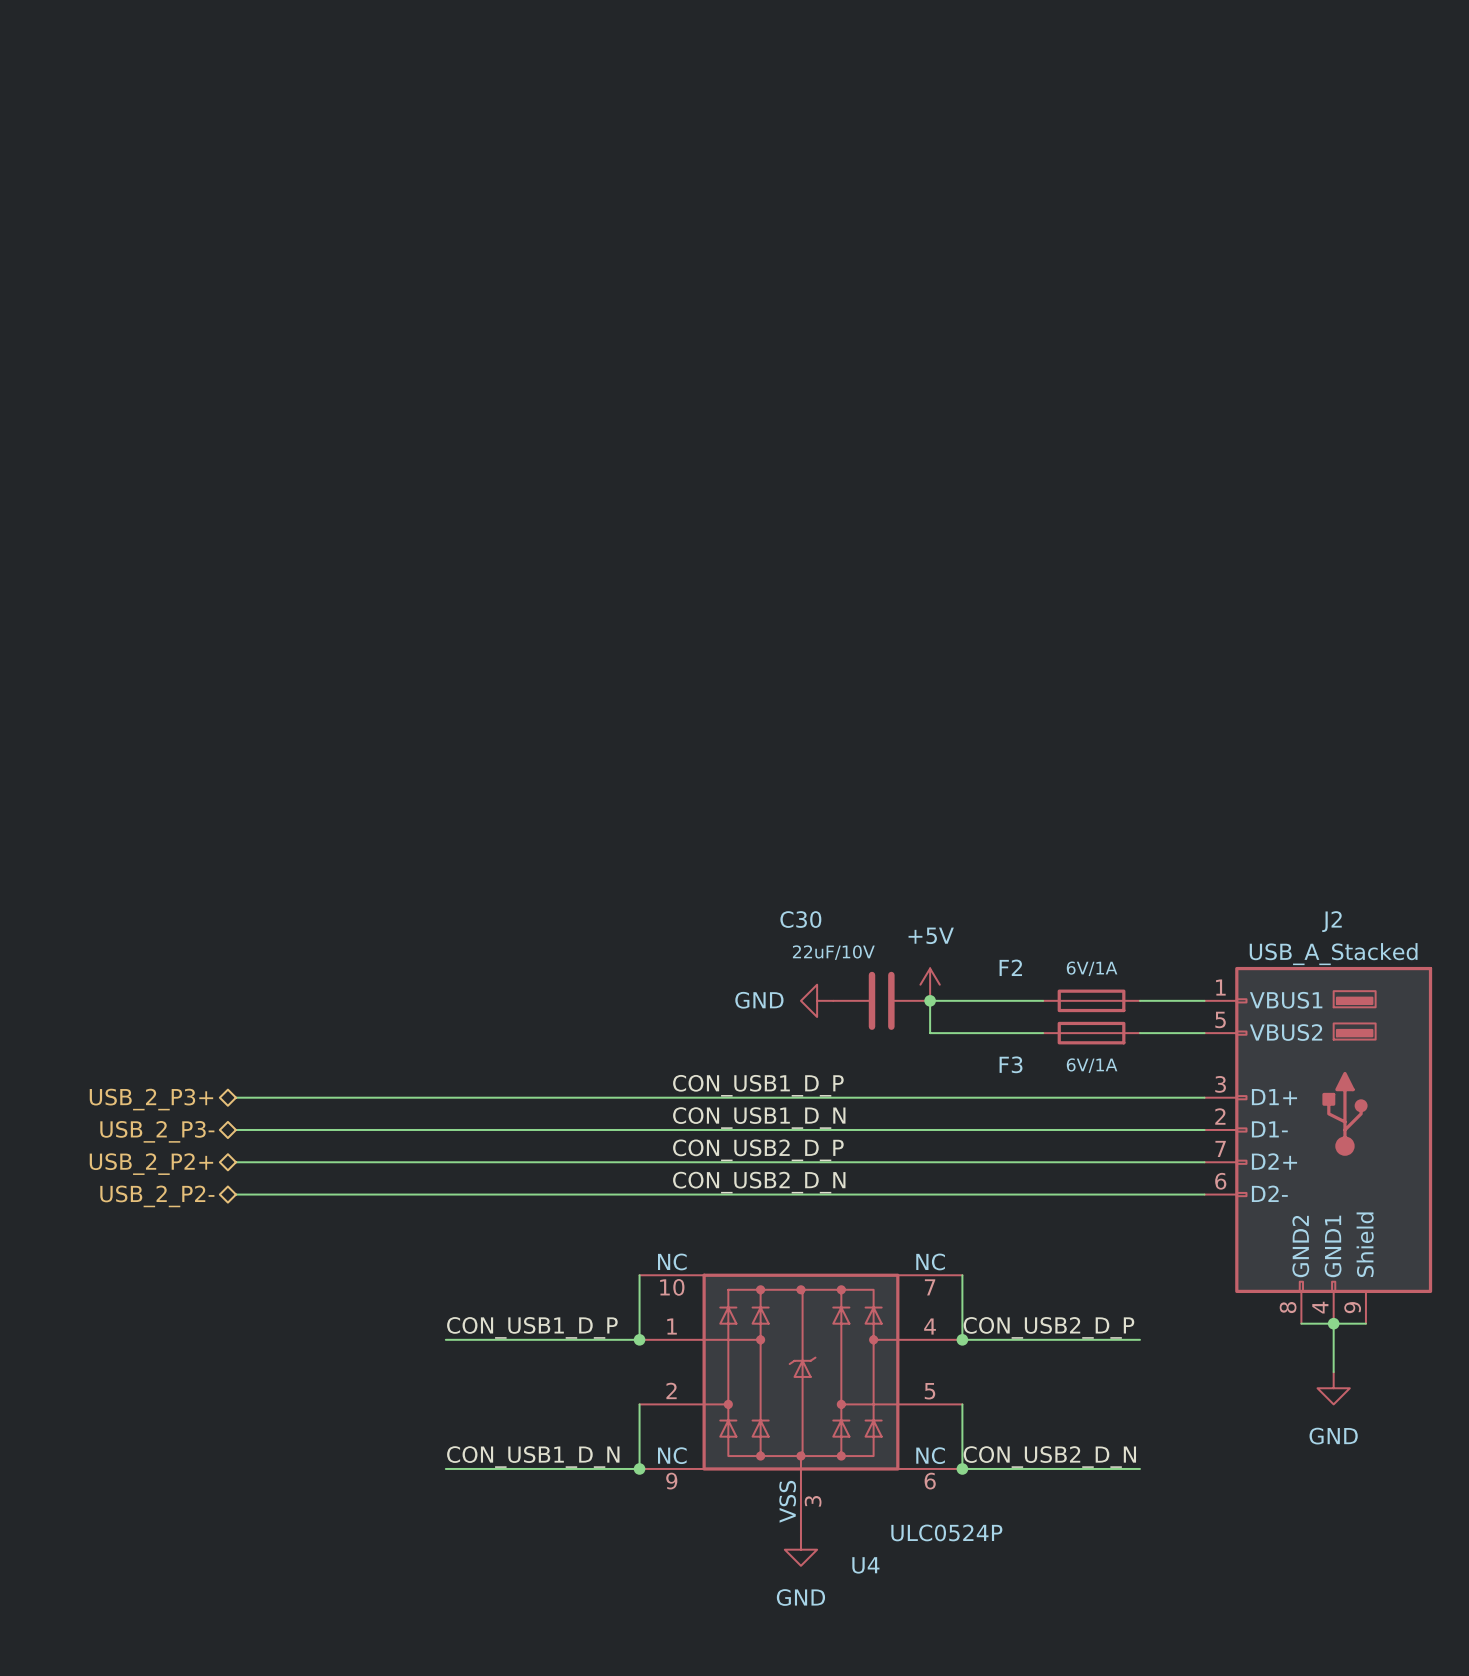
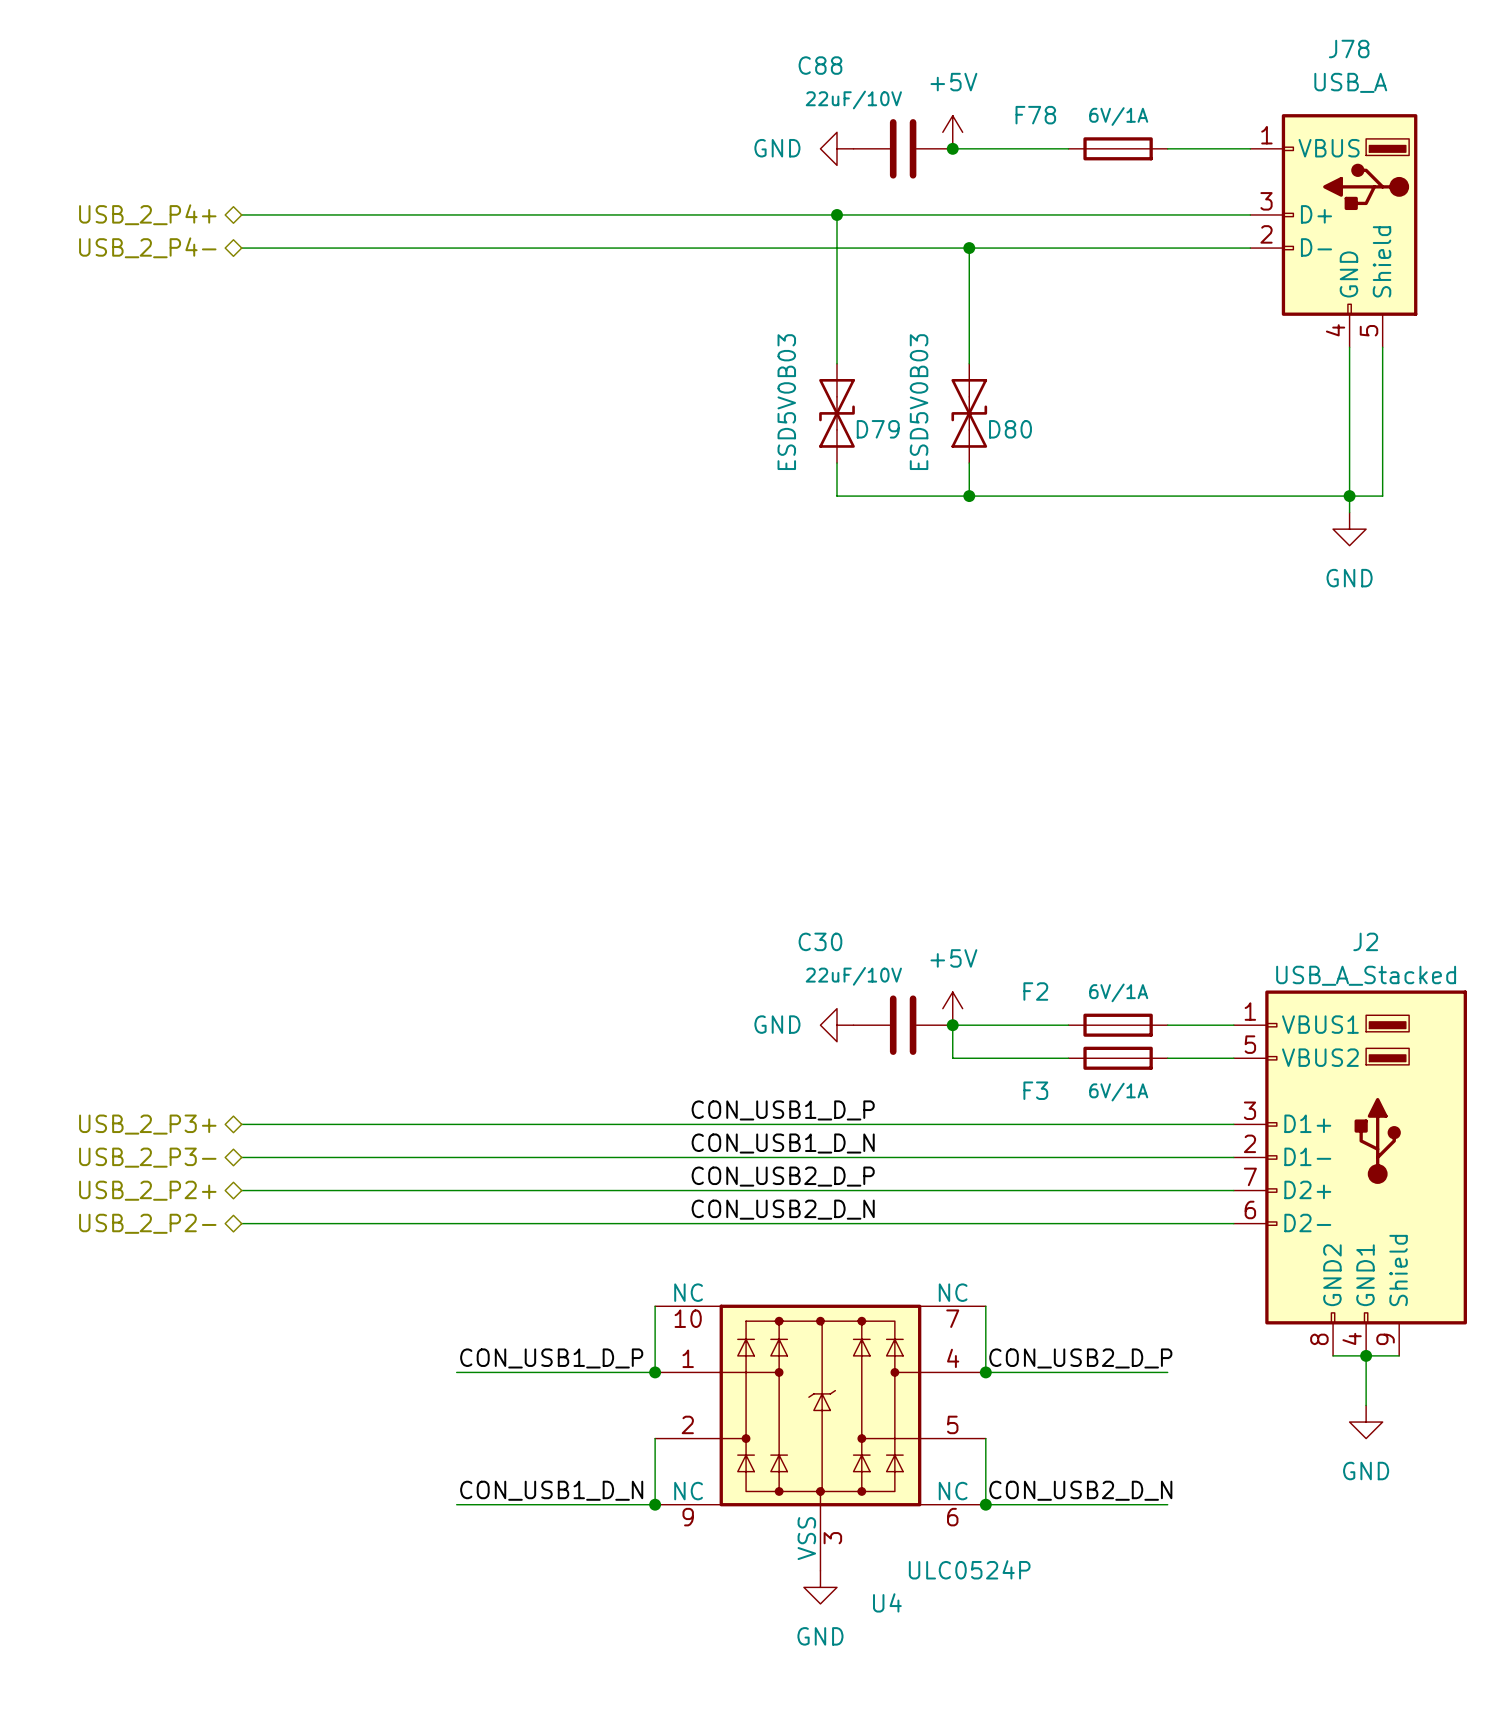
power symbol: none -> +5V (952, 132)
power symbol: none -> GND (837, 148)
C88: none -> 22uF/10V (903, 148)
wire: none -> (952, 148) (1068, 148)
junction: none -> (952, 148)
F78: none -> 6V/1A (1118, 148)
wire: none -> (1167, 148) (1250, 148)
wire: none -> (241, 214) (1250, 214)
wire: none -> (837, 214) (837, 363)
junction: none -> (837, 214)
hierarchical label: none -> USB_2_P4+ (147, 214)
J78: none -> USB_A (1333, 230)
wire: none -> (241, 248) (1250, 248)
wire: none -> (969, 248) (969, 363)
junction: none -> (969, 248)
hierarchical label: none -> USB_2_P4- (147, 247)
wire: none -> (1349, 347) (1349, 512)
wire: none -> (1382, 347) (1382, 496) (837, 496) (837, 463)
D79: none -> ESD5V0B03 (837, 413)
D80: none -> ESD5V0B03 (969, 413)
wire: none -> (969, 463) (969, 496)
junction: none -> (969, 496)
junction: none -> (1349, 496)
power symbol: none -> GND (1349, 529)

